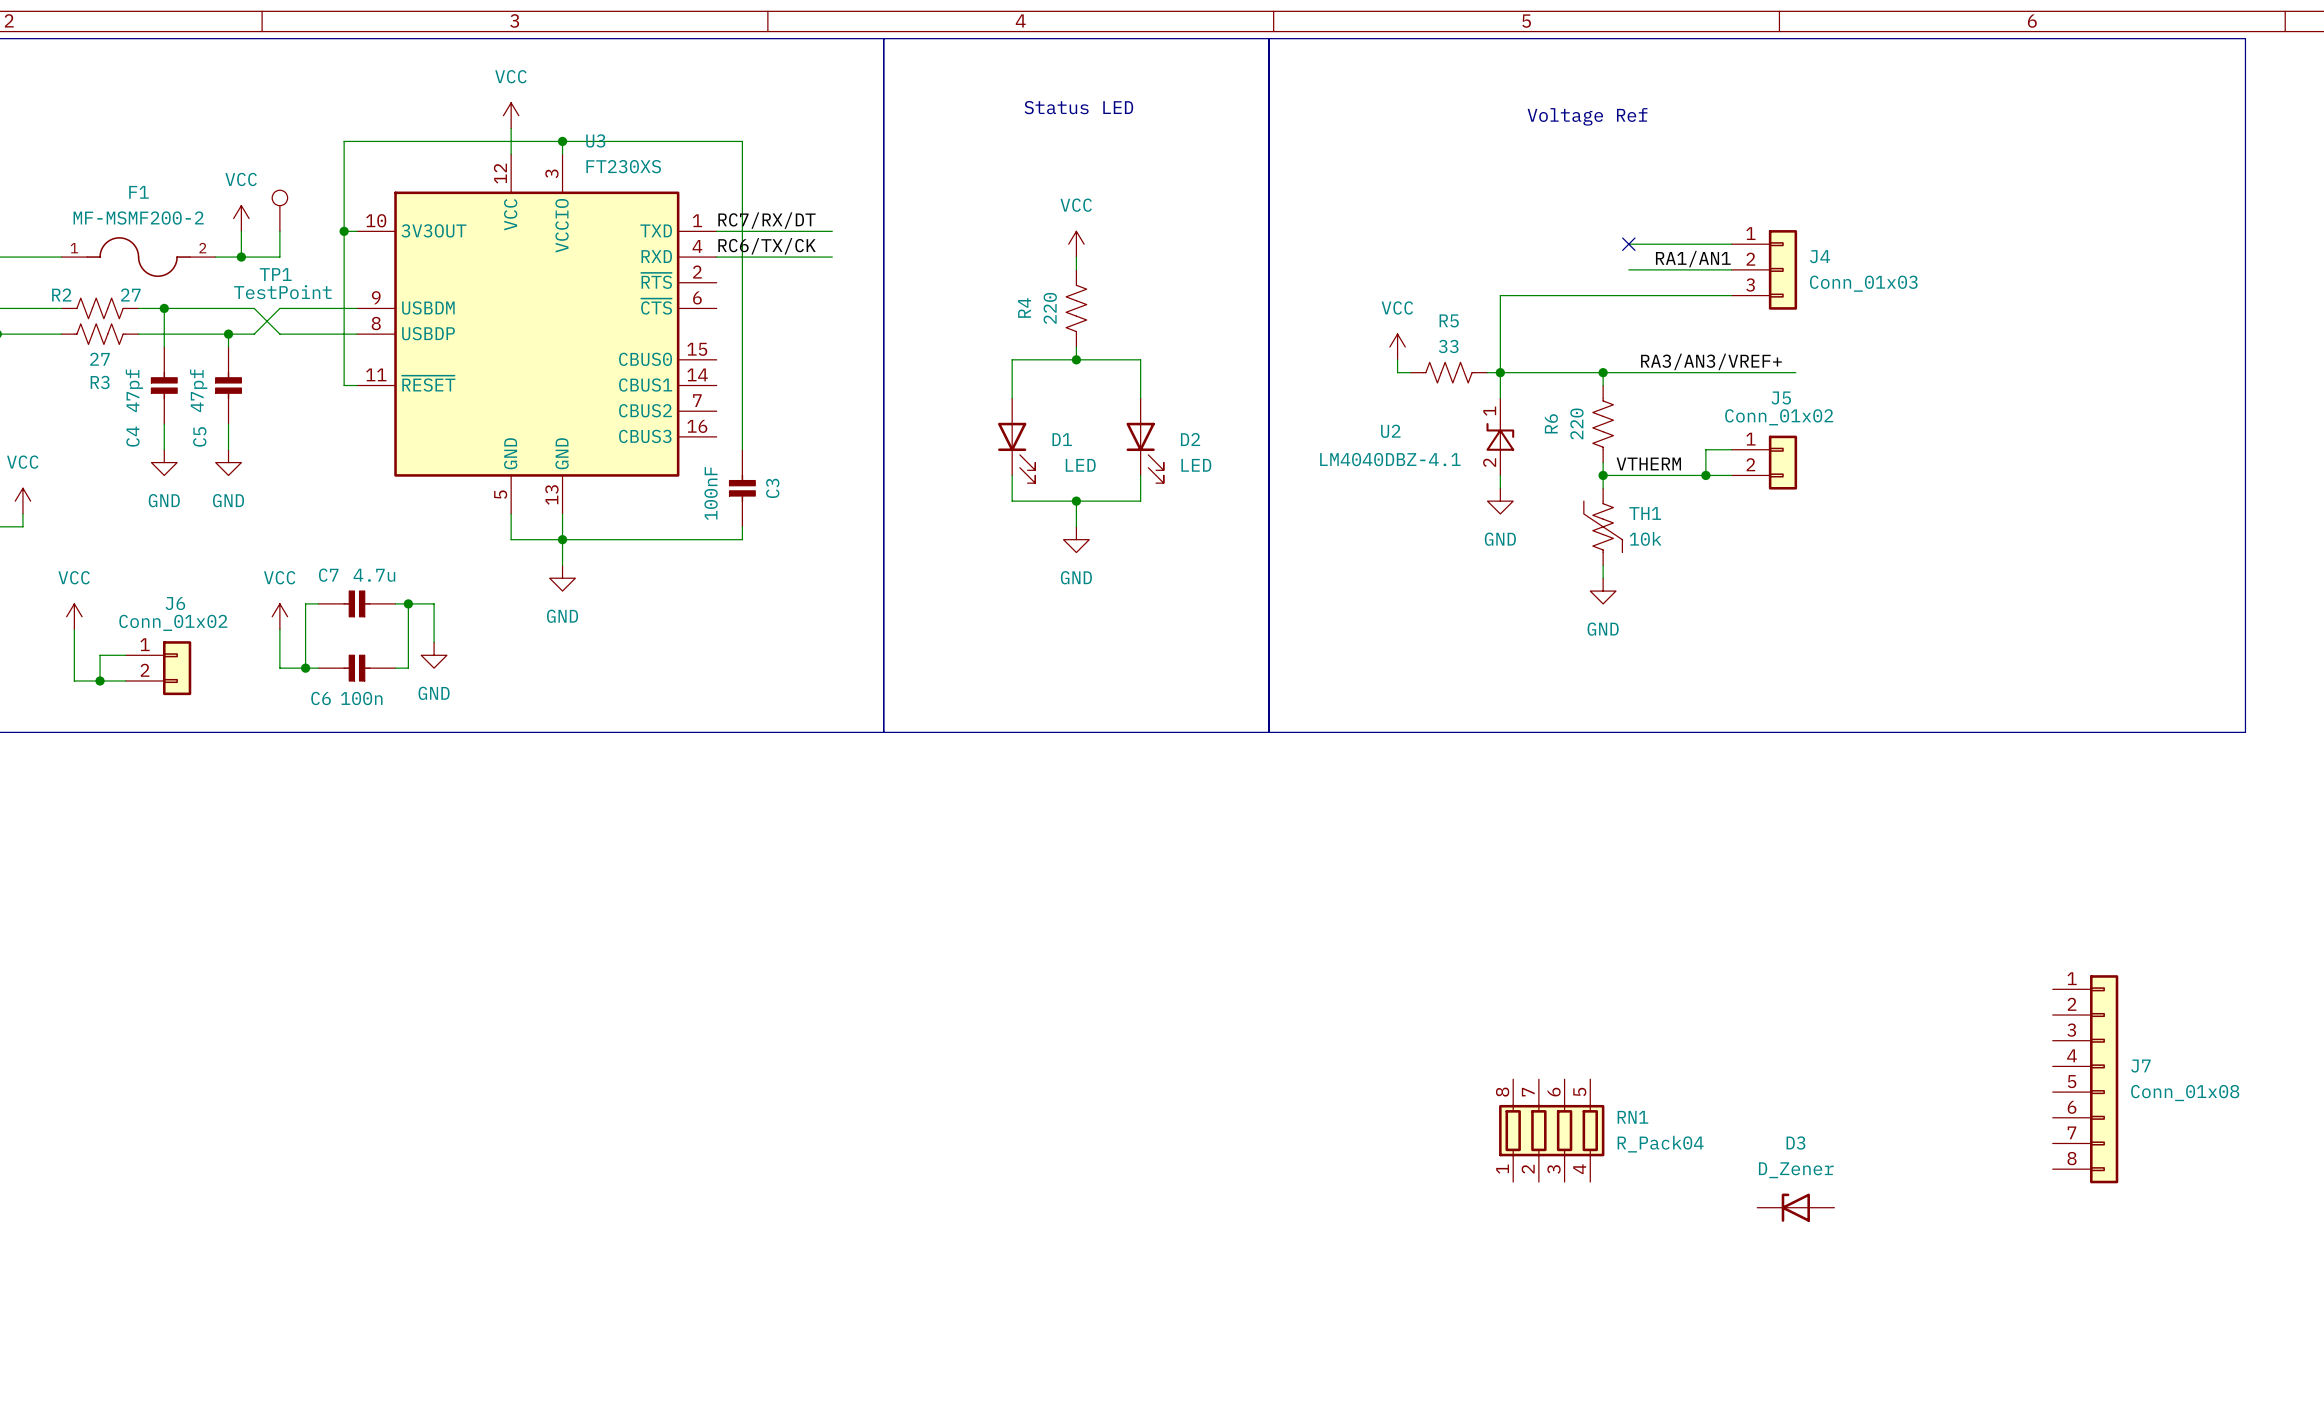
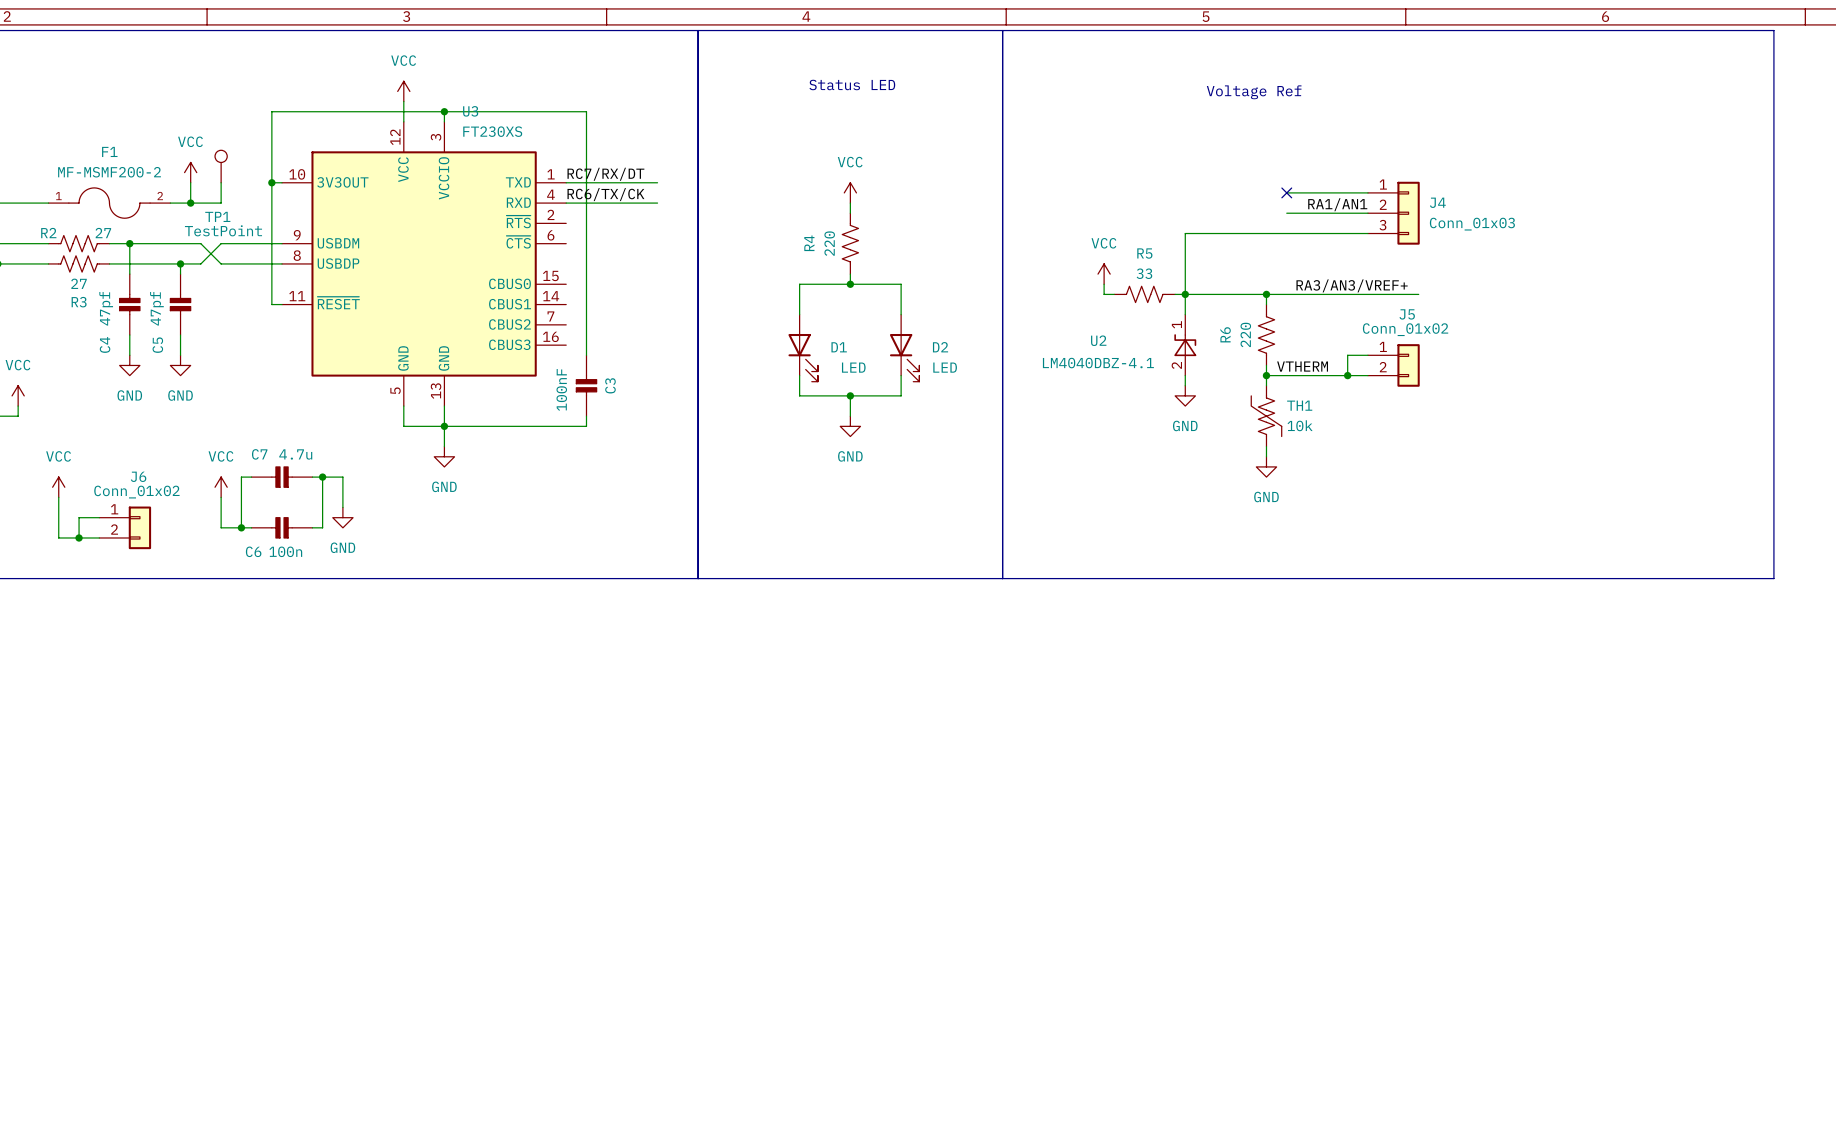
J7: Conn_01x08 (2085, 1079) -> none
RN1: R_Pack04 (1551, 1130) -> none
D3: D_Zener (1795, 1207) -> none

